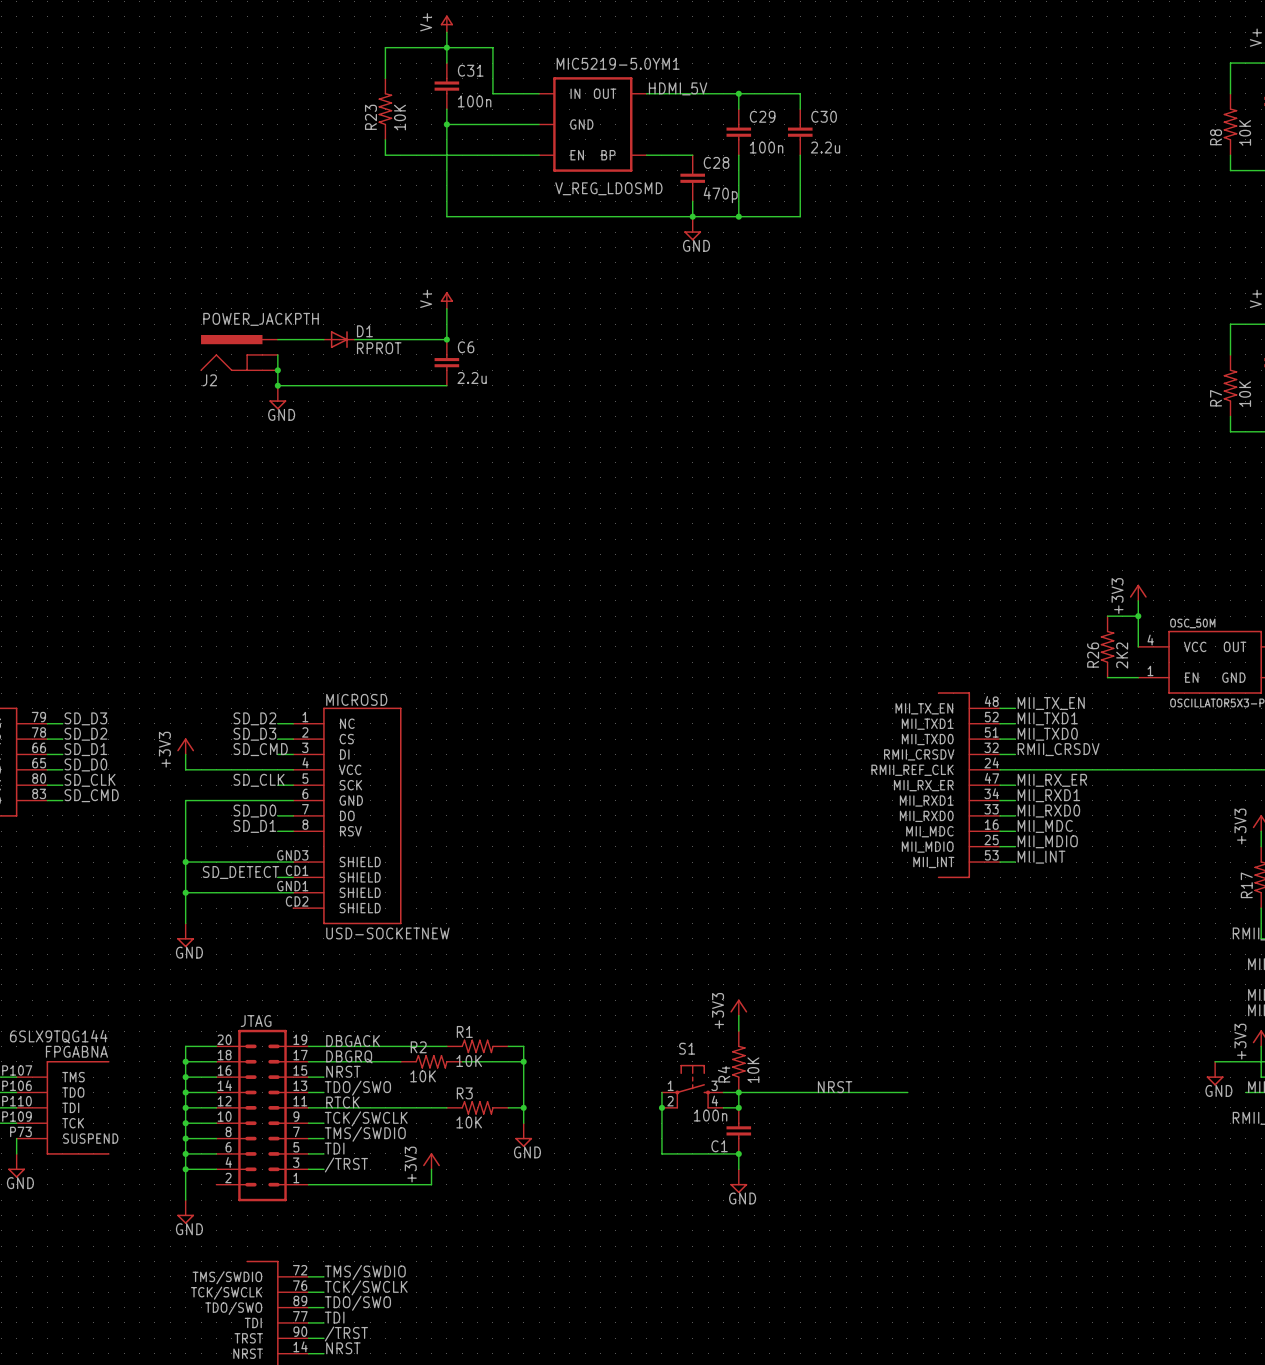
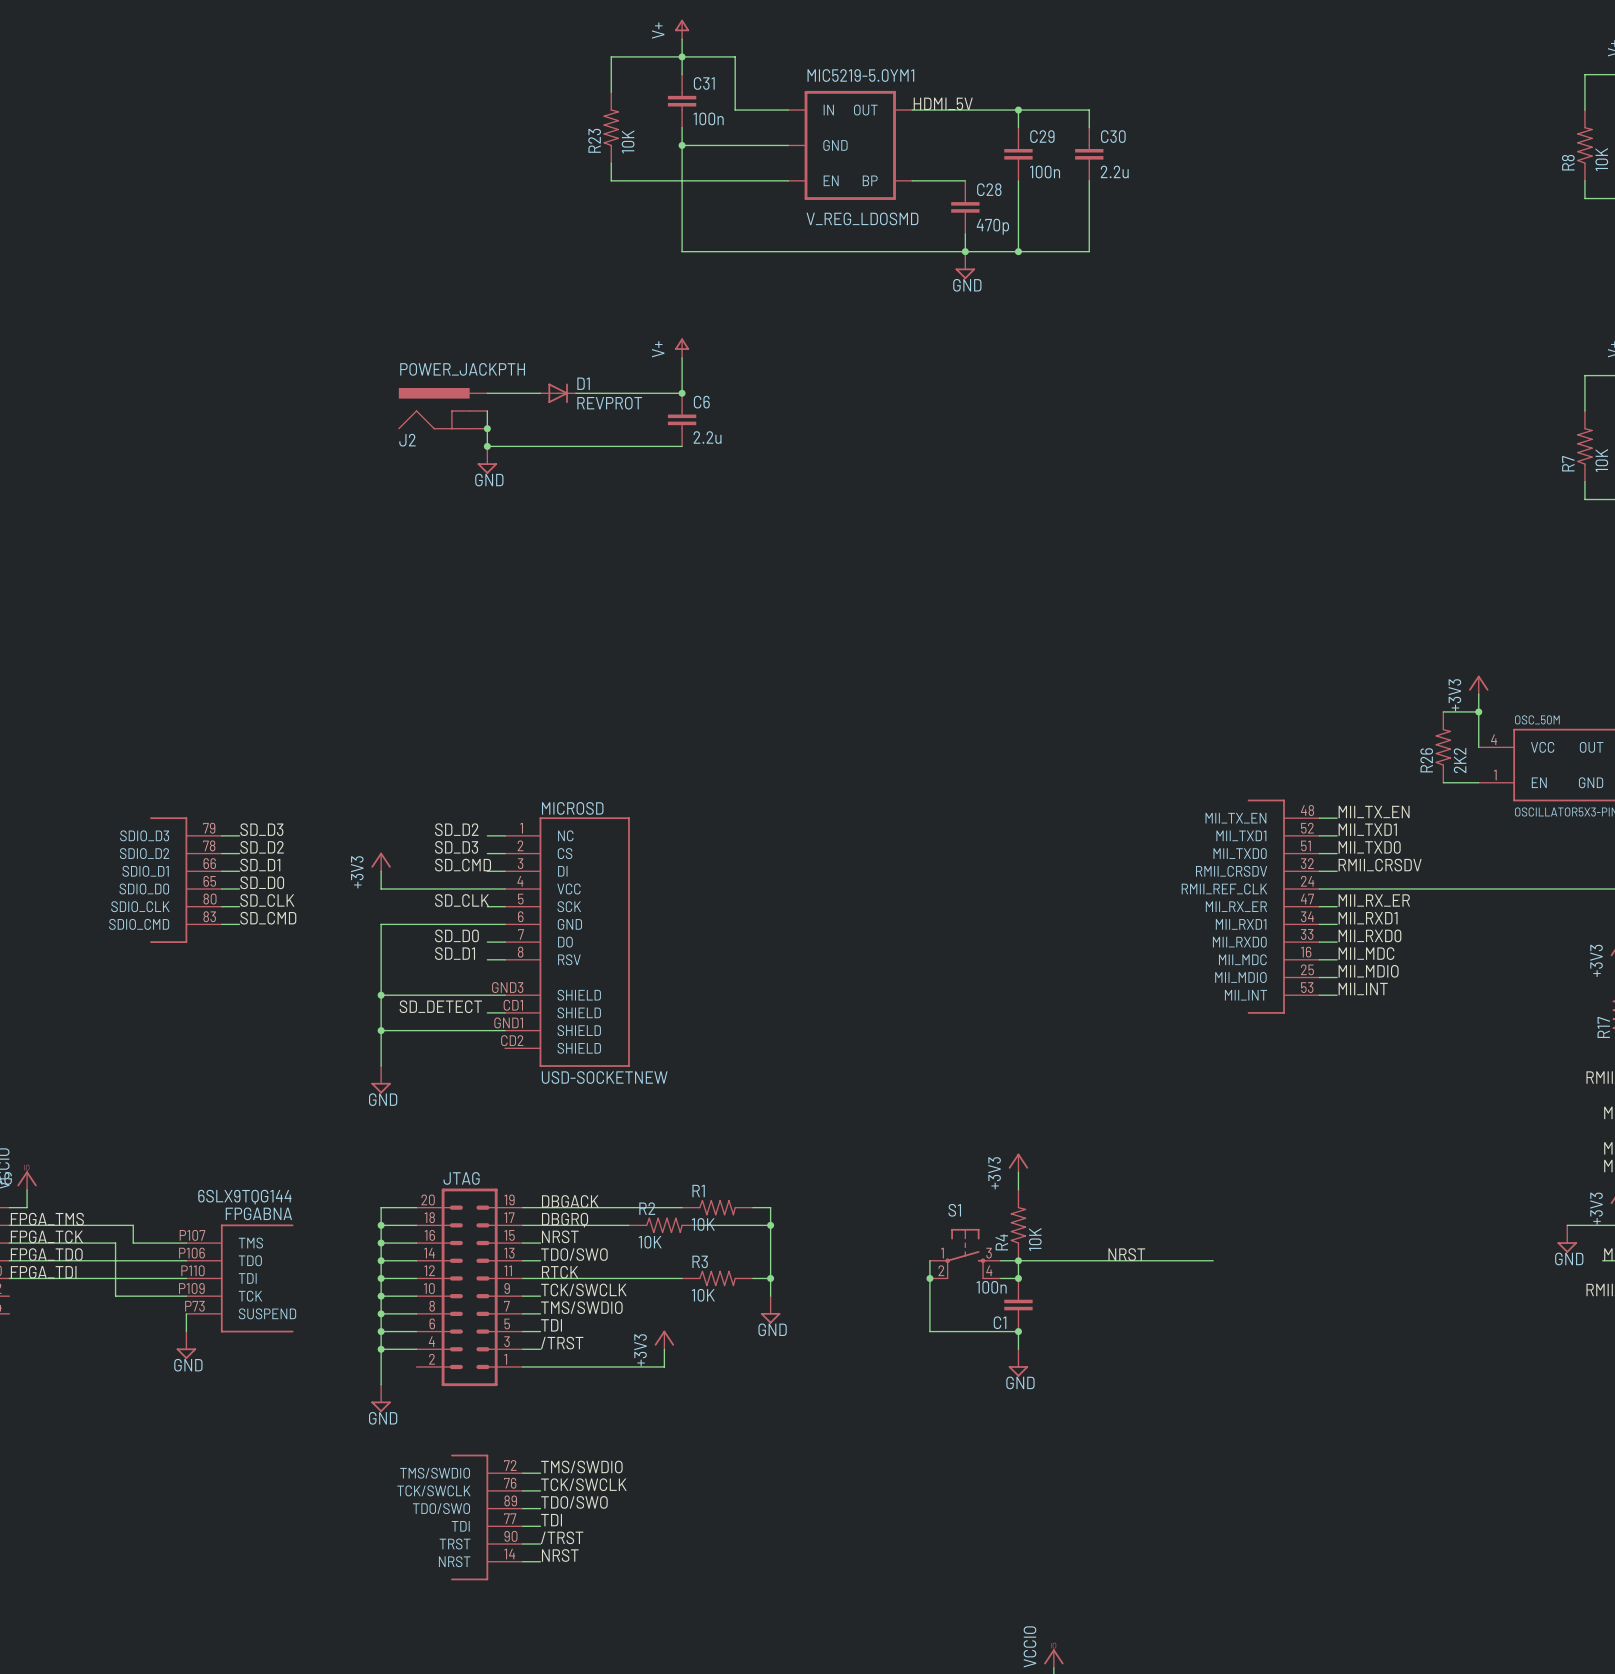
D1 value: RPROT (379, 348) -> REVPROT (609, 403)

